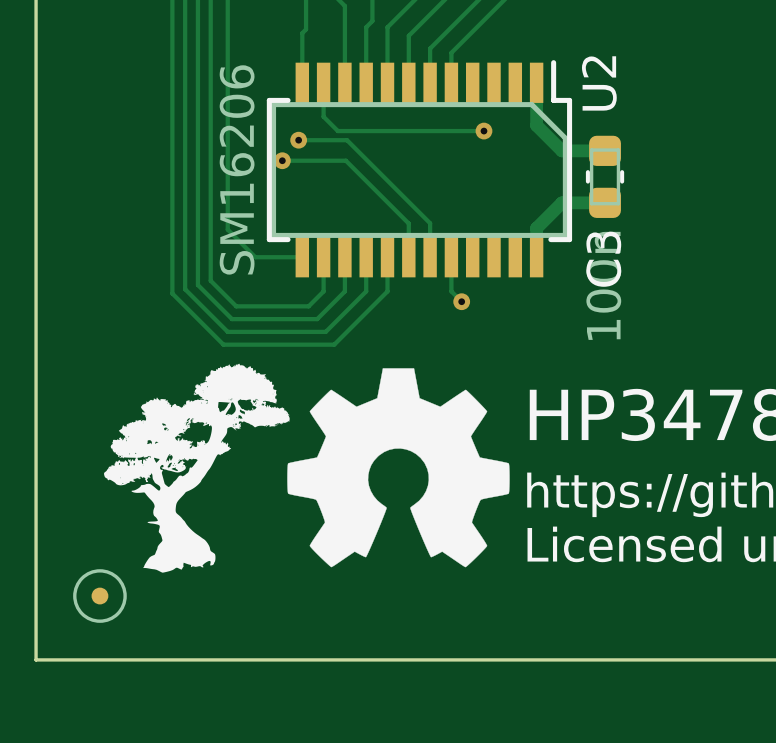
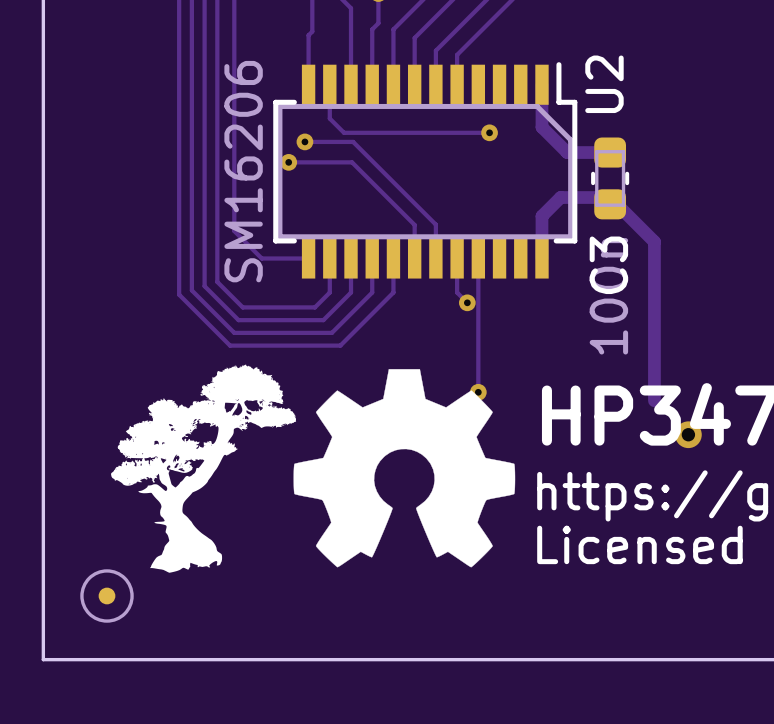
track: (605, 202) (561, 202) (536, 228) -> (654, 400) (654, 241) (610, 197) (560, 197) (541, 216) (541, 229)
track: none -> (478, 258) (478, 392)
via: none -> (478, 392)
via: none -> (688, 434)

